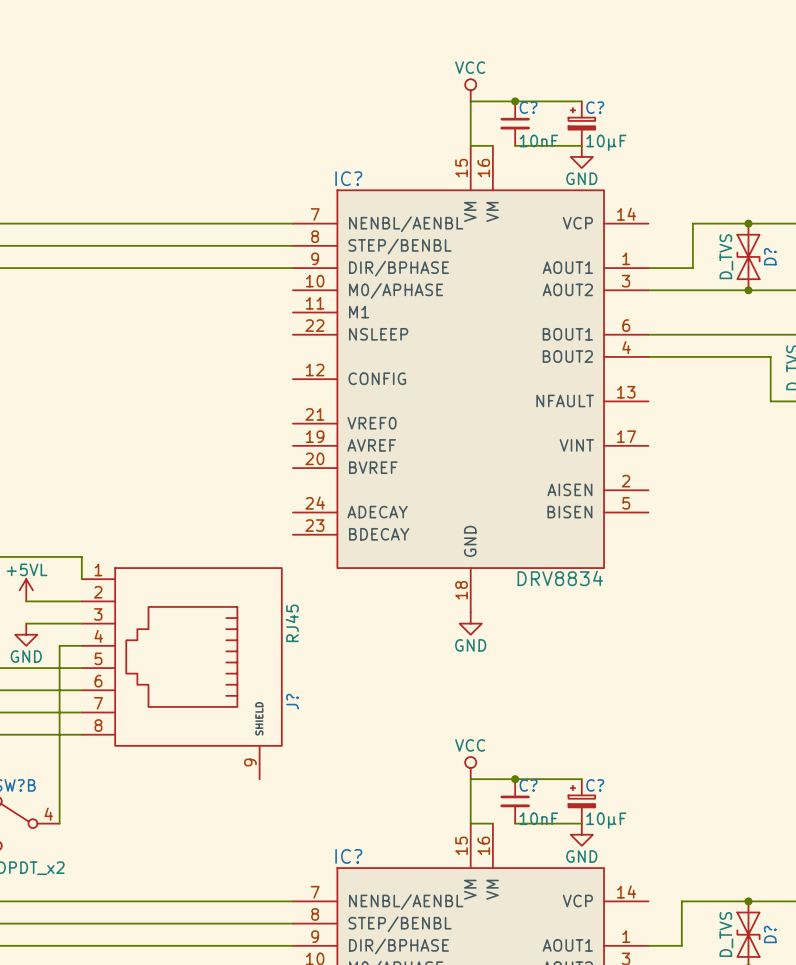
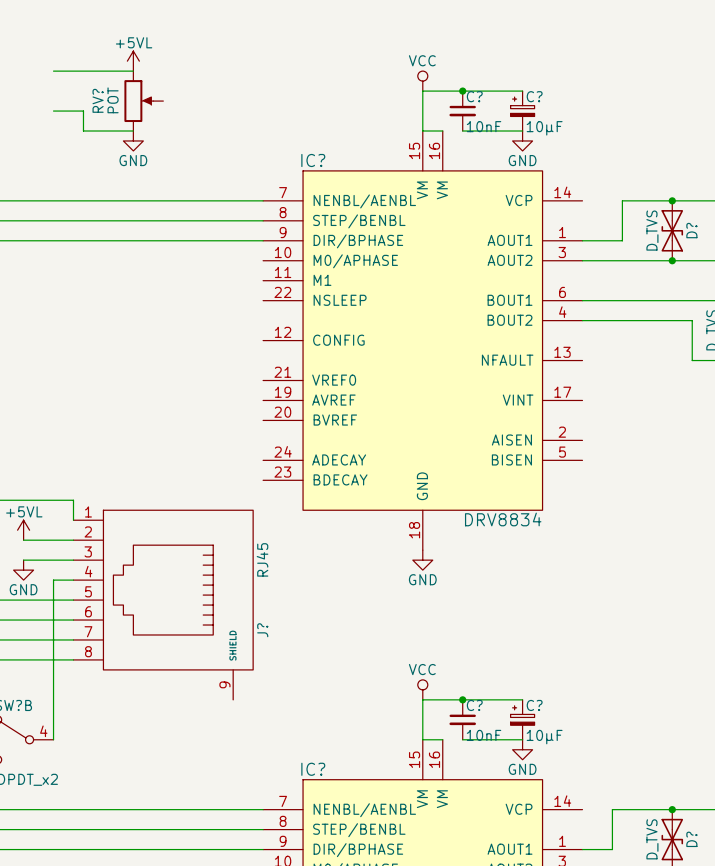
power symbol: none -> +5VL (133, 61)
wire: none -> (53, 71) (133, 71)
RV?: none -> POT (143, 101)
wire: none -> (53, 111) (83, 111) (83, 131) (133, 131)
power symbol: none -> GND (133, 140)

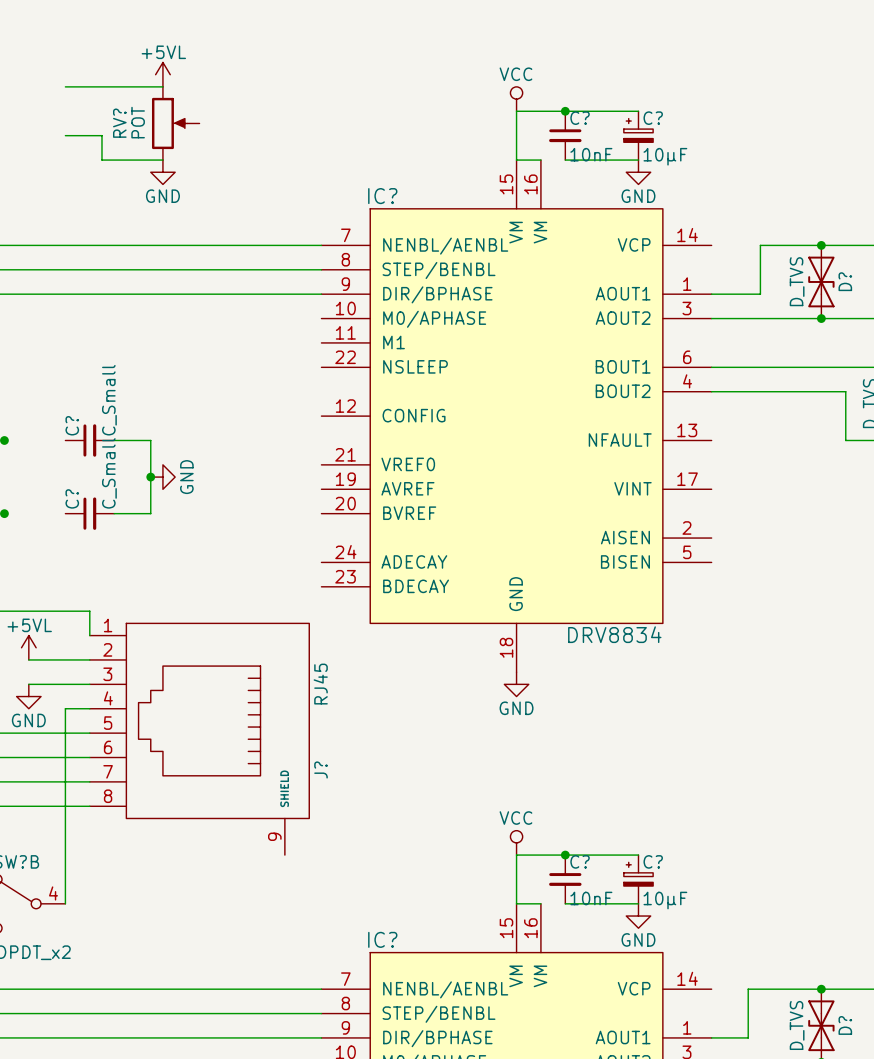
junction: none -> (4, 440)
C?: none -> C_Small (89, 440)
wire: none -> (114, 440) (150, 440) (150, 513) (114, 513)
junction: none -> (150, 477)
power symbol: none -> GND (162, 477)
junction: none -> (4, 513)
C?: none -> C_Small (89, 513)

